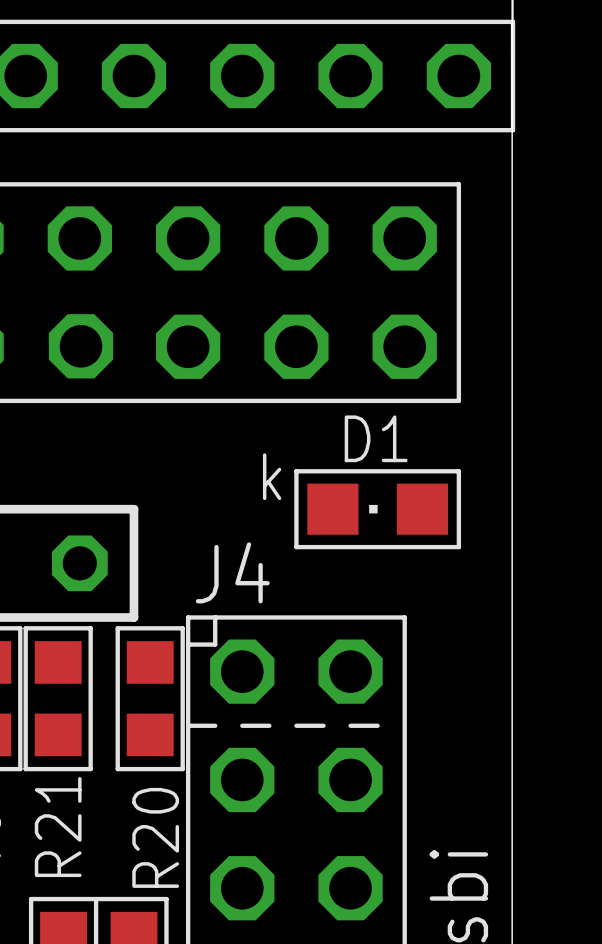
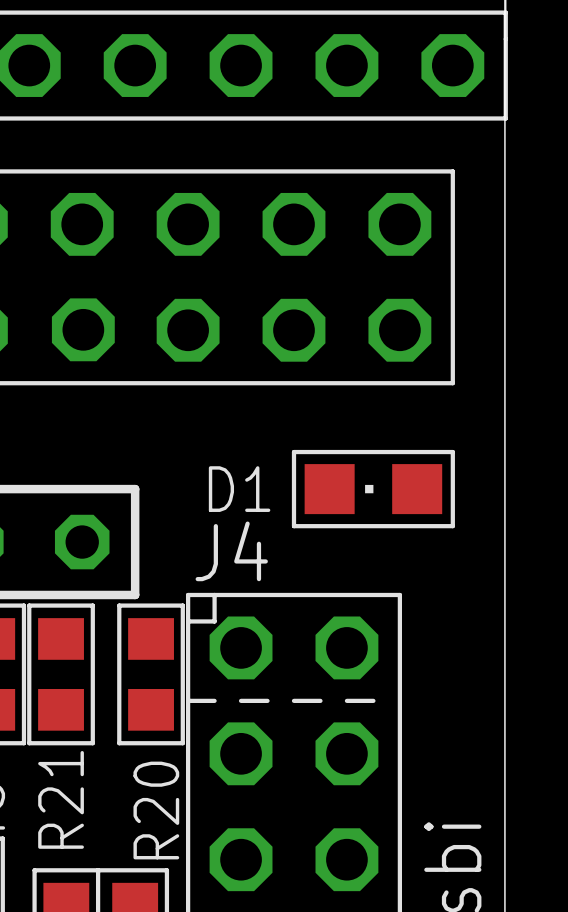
D1 name position: D1 (376, 438) -> D1 (239, 489)
text: k (272, 476) -> none

